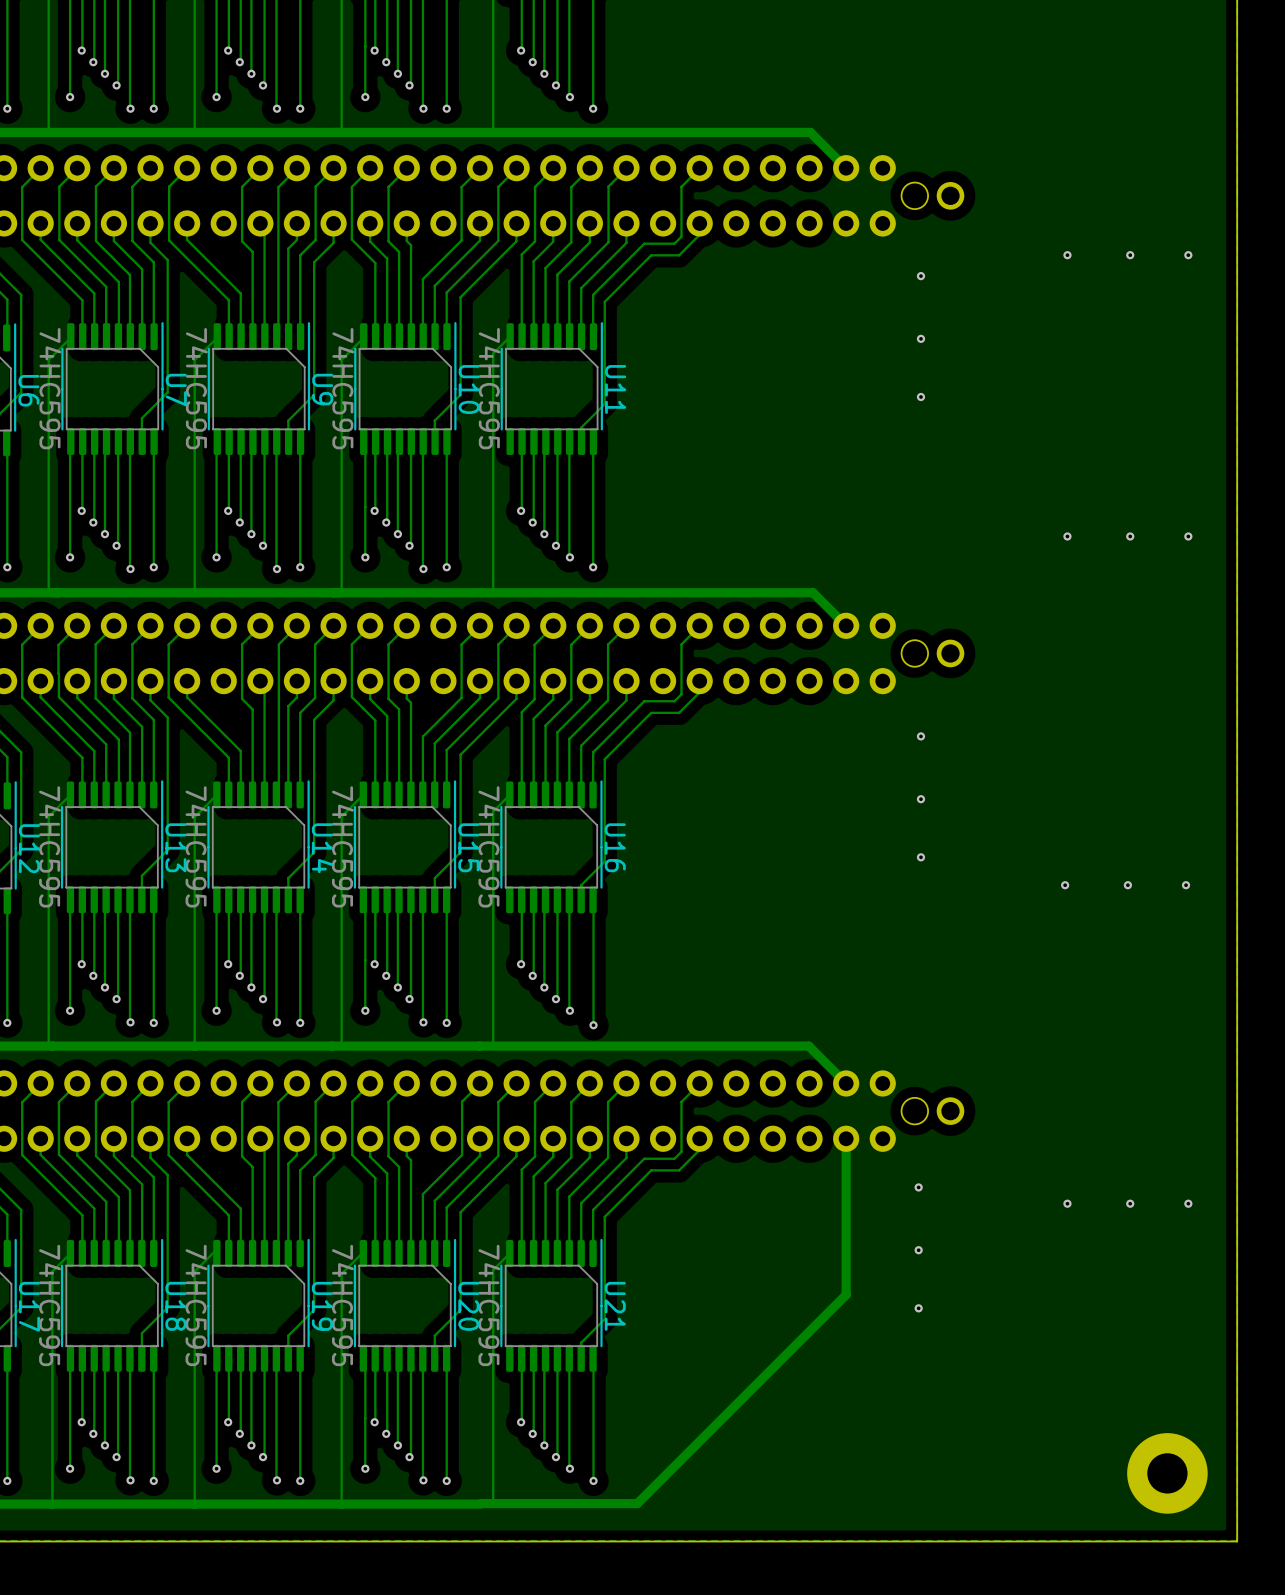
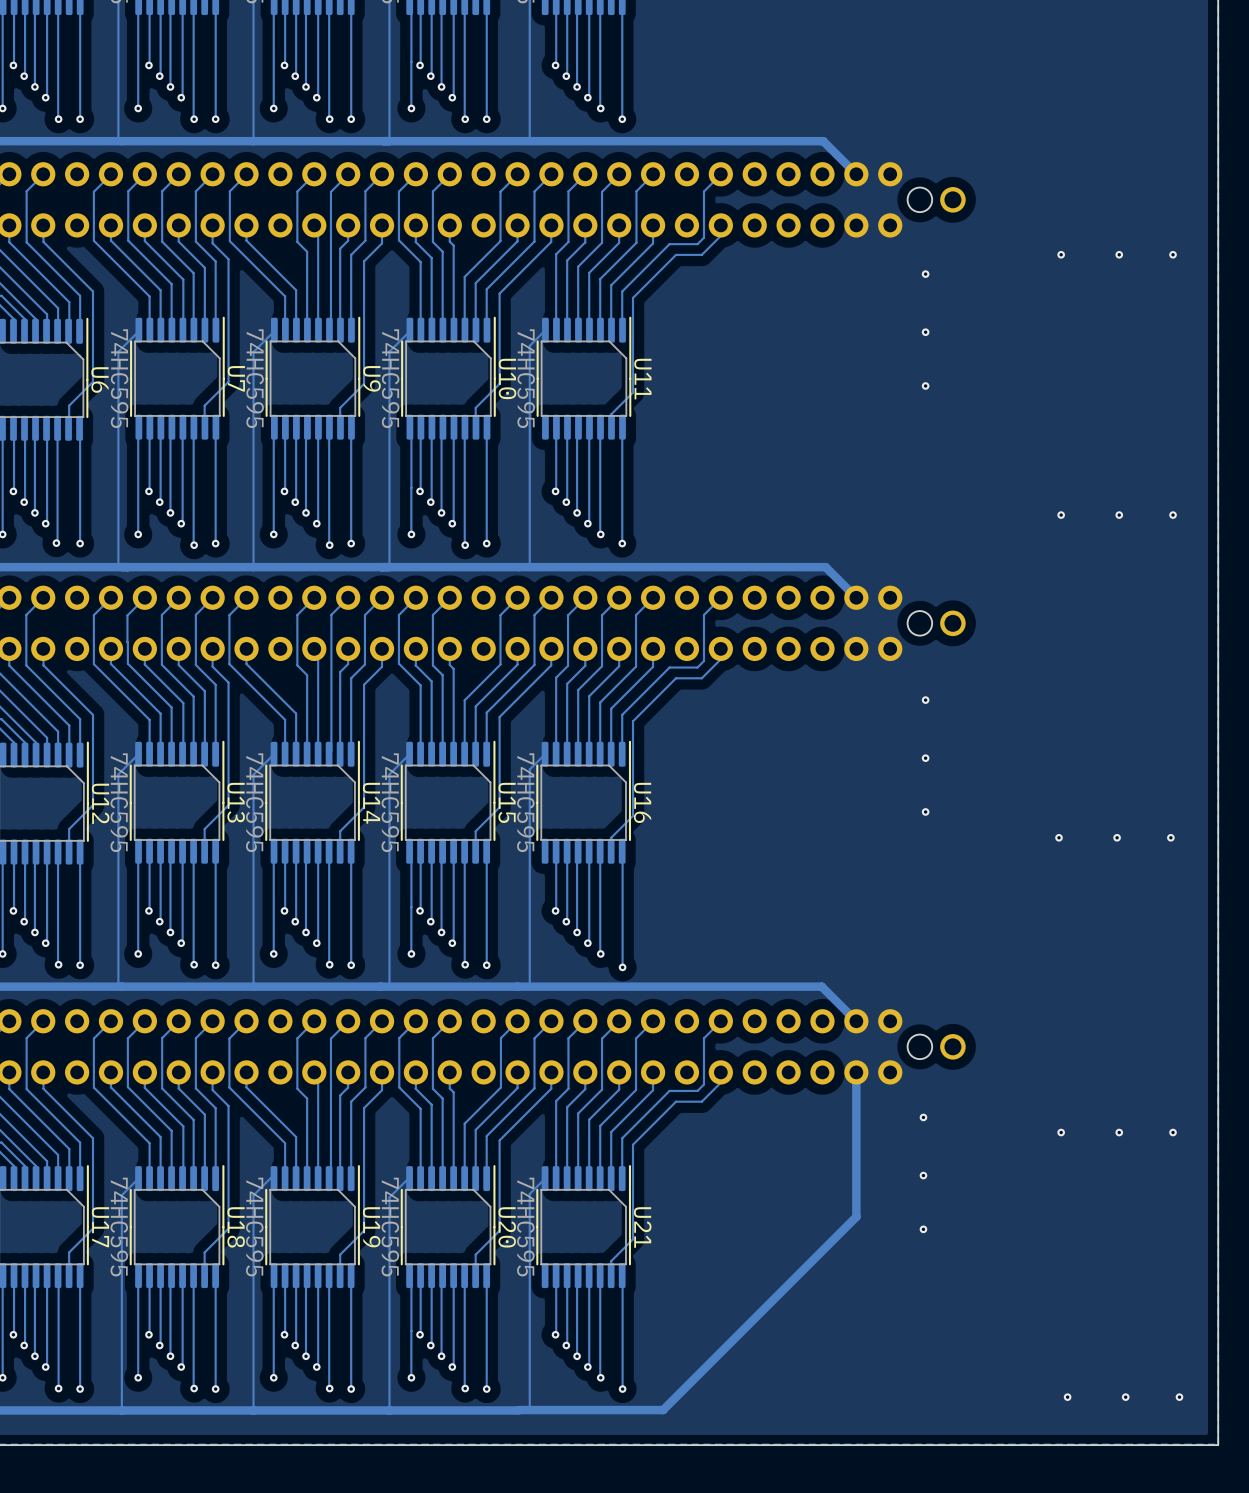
part: (1167, 1473) -> none
via: none -> (1067, 1397)
via: none -> (1125, 1397)
via: none -> (1179, 1397)

